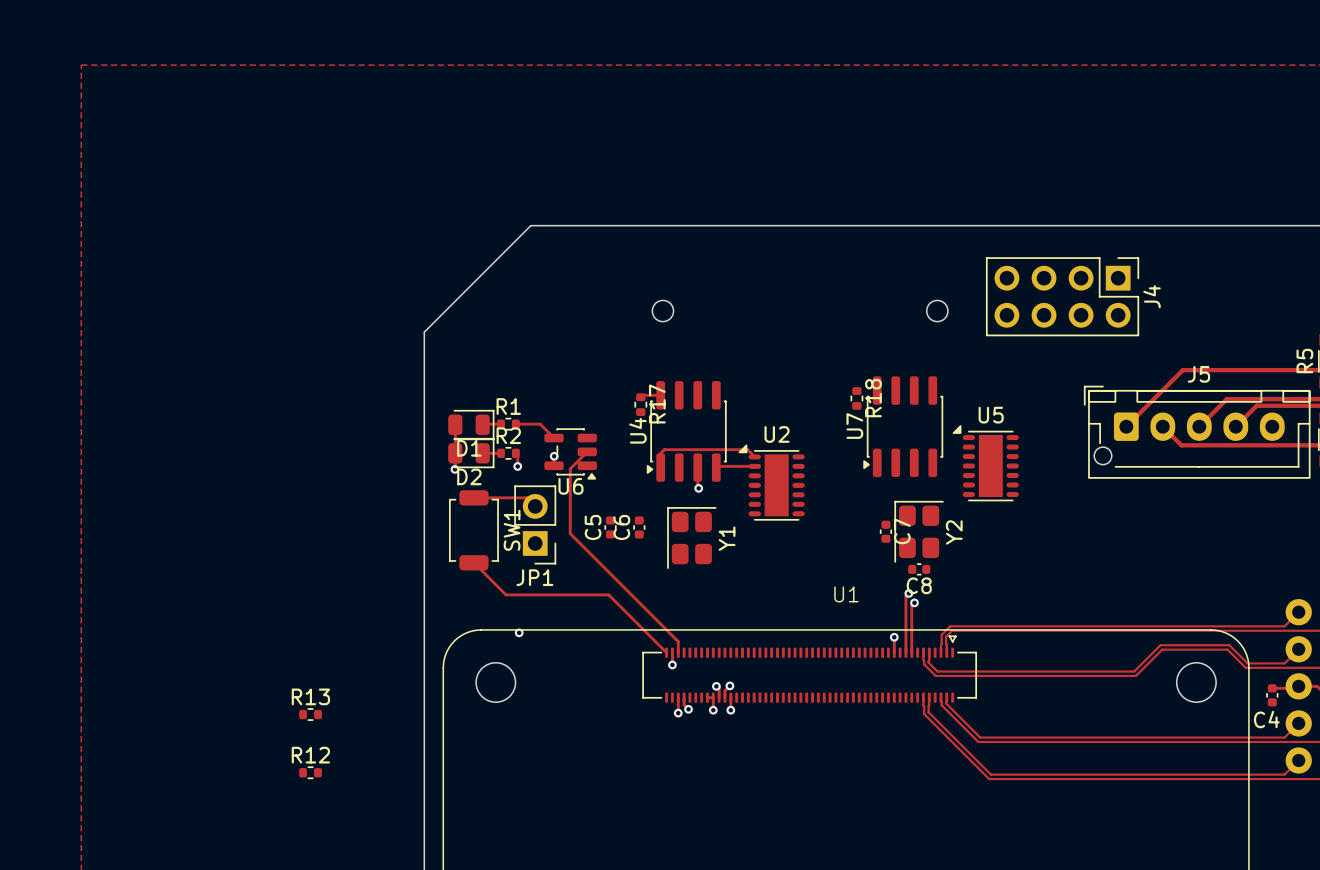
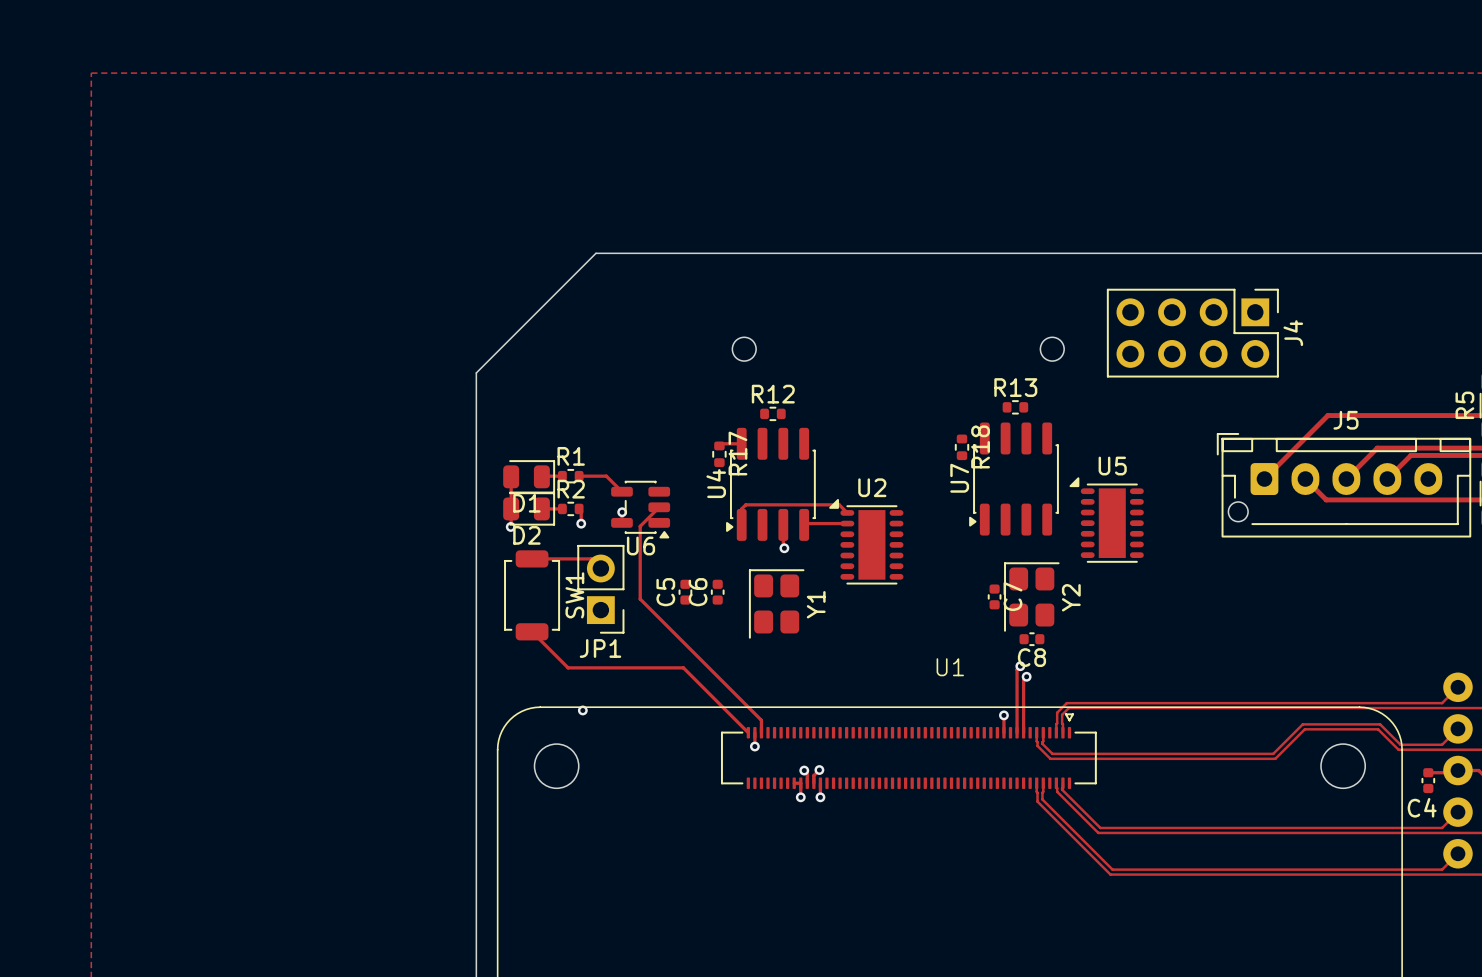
track: (678, 697) (678, 713) -> none
track: (684, 697) (684, 704) (688, 709) -> none
via: (688, 709) -> none
via: (678, 713) -> none
R13 position: (310, 714) -> (1015, 407)
R12 position: (310, 772) -> (772, 413)

